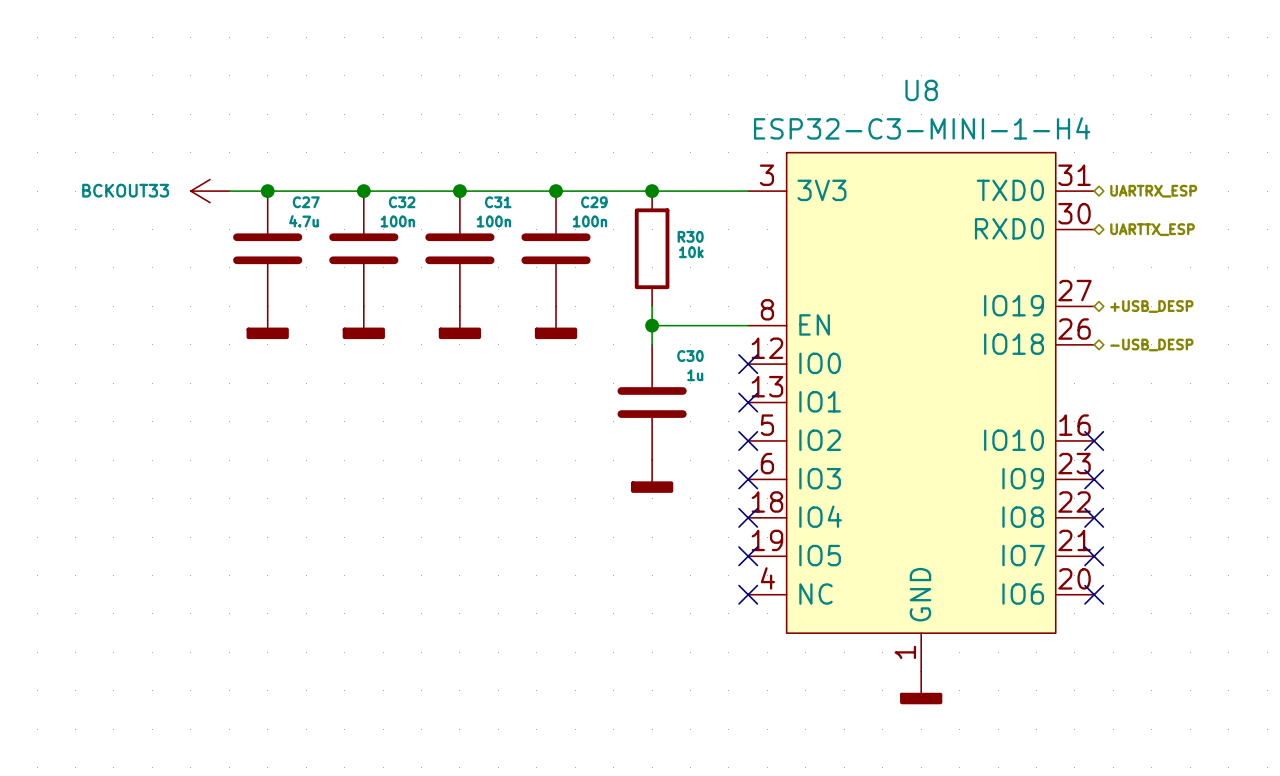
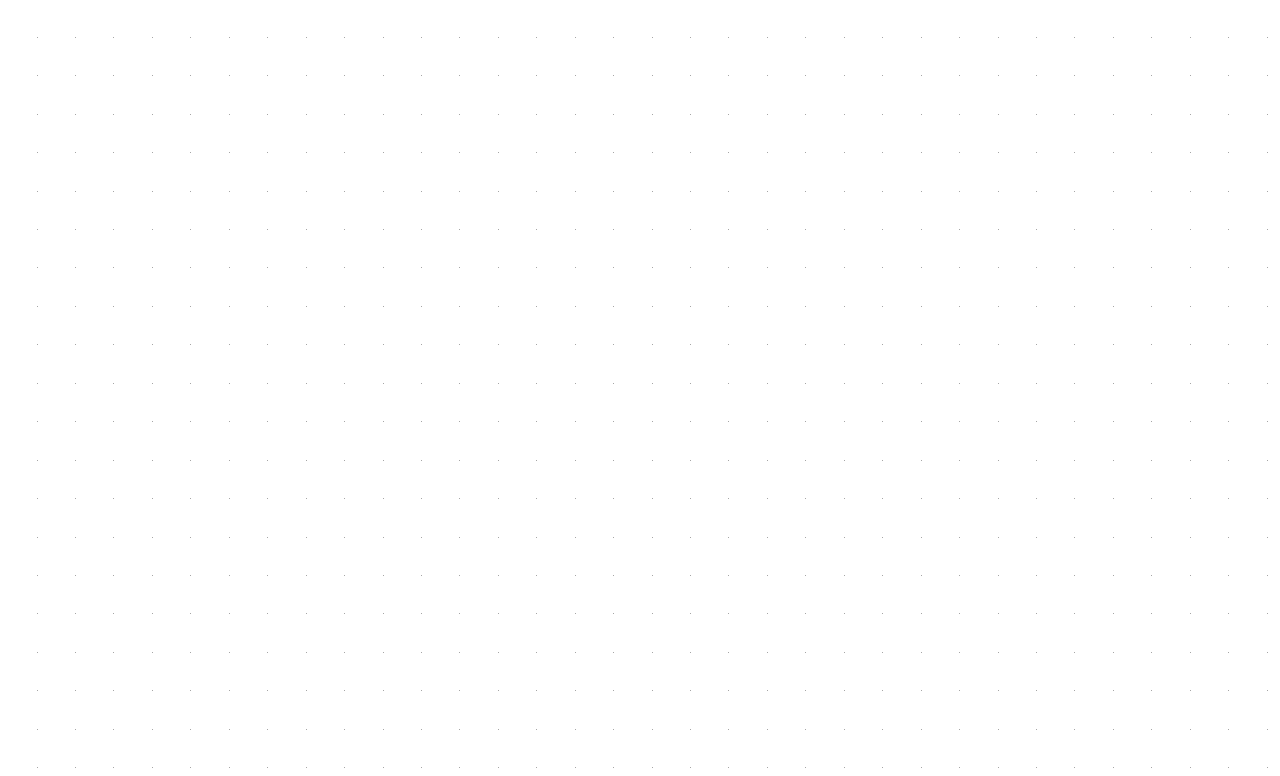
power symbol: BCKOUT33 (210, 191) -> none
wire: (229, 191) (748, 191) -> none
junction: (267, 191) -> none
junction: (363, 191) -> none
junction: (459, 191) -> none
junction: (556, 191) -> none
junction: (652, 191) -> none
hierarchical label: UARTRX_ESP (1153, 191) -> none
hierarchical label: UARTTX_ESP (1152, 229) -> none
C27: 4.7u (267, 248) -> none
C32: 100n (363, 248) -> none
C31: 100n (459, 248) -> none
C29: 100n (556, 248) -> none
R30: 10k (652, 248) -> none
wire: (652, 306) (652, 344) -> none
hierarchical label: +USB_DESP (1151, 306) -> none
power symbol: (267, 322) -> none
power symbol: (363, 322) -> none
power symbol: (459, 322) -> none
power symbol: (556, 322) -> none
wire: (652, 325) (748, 325) -> none
junction: (652, 325) -> none
hierarchical label: -USB_DESP (1151, 344) -> none
no-connect mark: (748, 364) -> none
C30: 1u (652, 402) -> none
no-connect mark: (748, 402) -> none
U8: ESP32-C3-MINI-1-H4 (921, 412) -> none
no-connect mark: (748, 440) -> none
no-connect mark: (1094, 440) -> none
power symbol: (652, 476) -> none
no-connect mark: (748, 479) -> none
no-connect mark: (1094, 479) -> none
no-connect mark: (748, 517) -> none
no-connect mark: (1094, 517) -> none
no-connect mark: (748, 556) -> none
no-connect mark: (1094, 556) -> none
no-connect mark: (748, 594) -> none
no-connect mark: (1094, 594) -> none
power symbol: (921, 687) -> none

